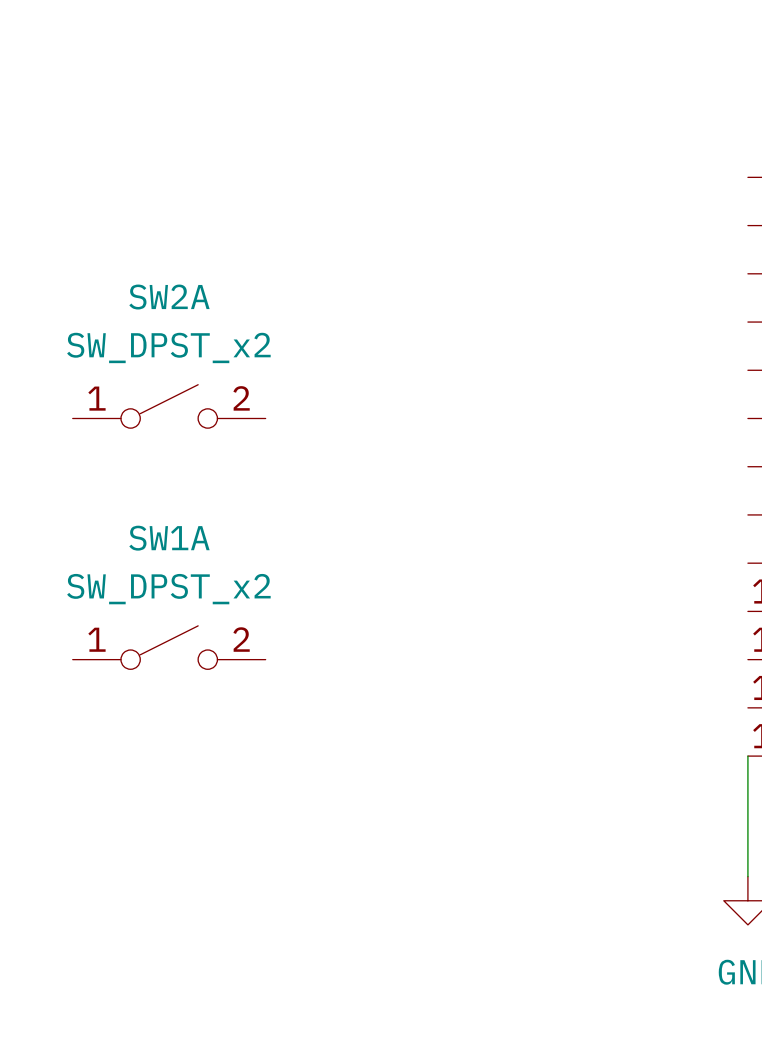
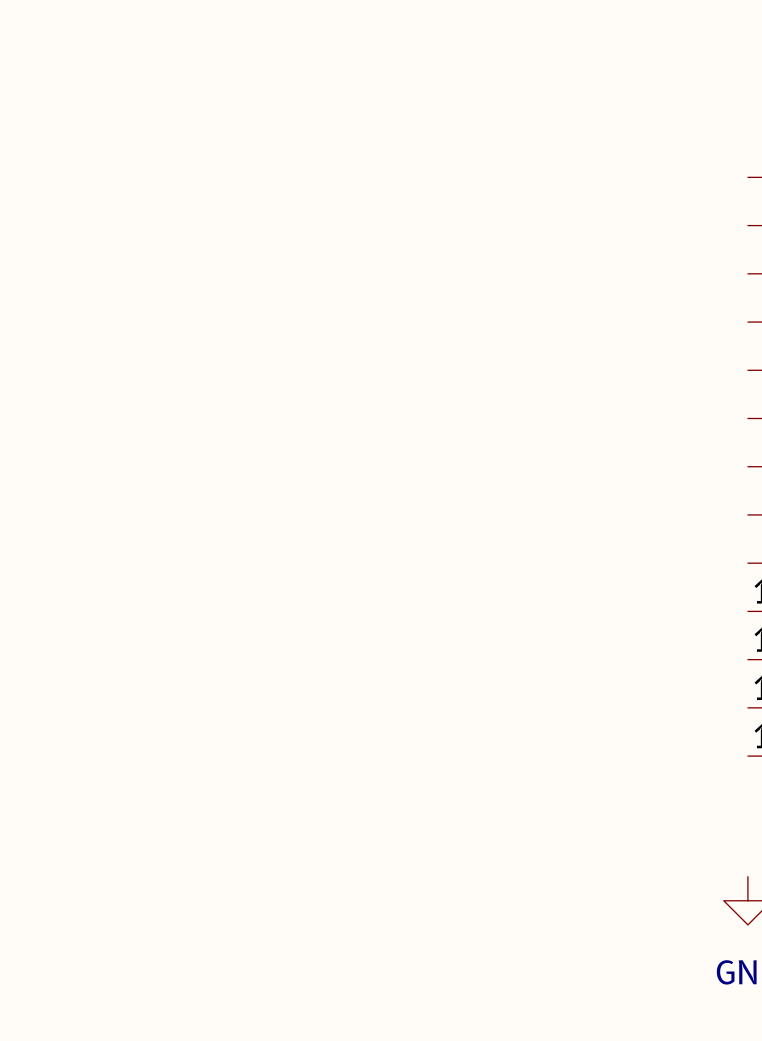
SW2A: SW_DPST_x2 (169, 406) -> none
SW1A: SW_DPST_x2 (169, 647) -> none
wire: (747, 756) (747, 876) -> none

